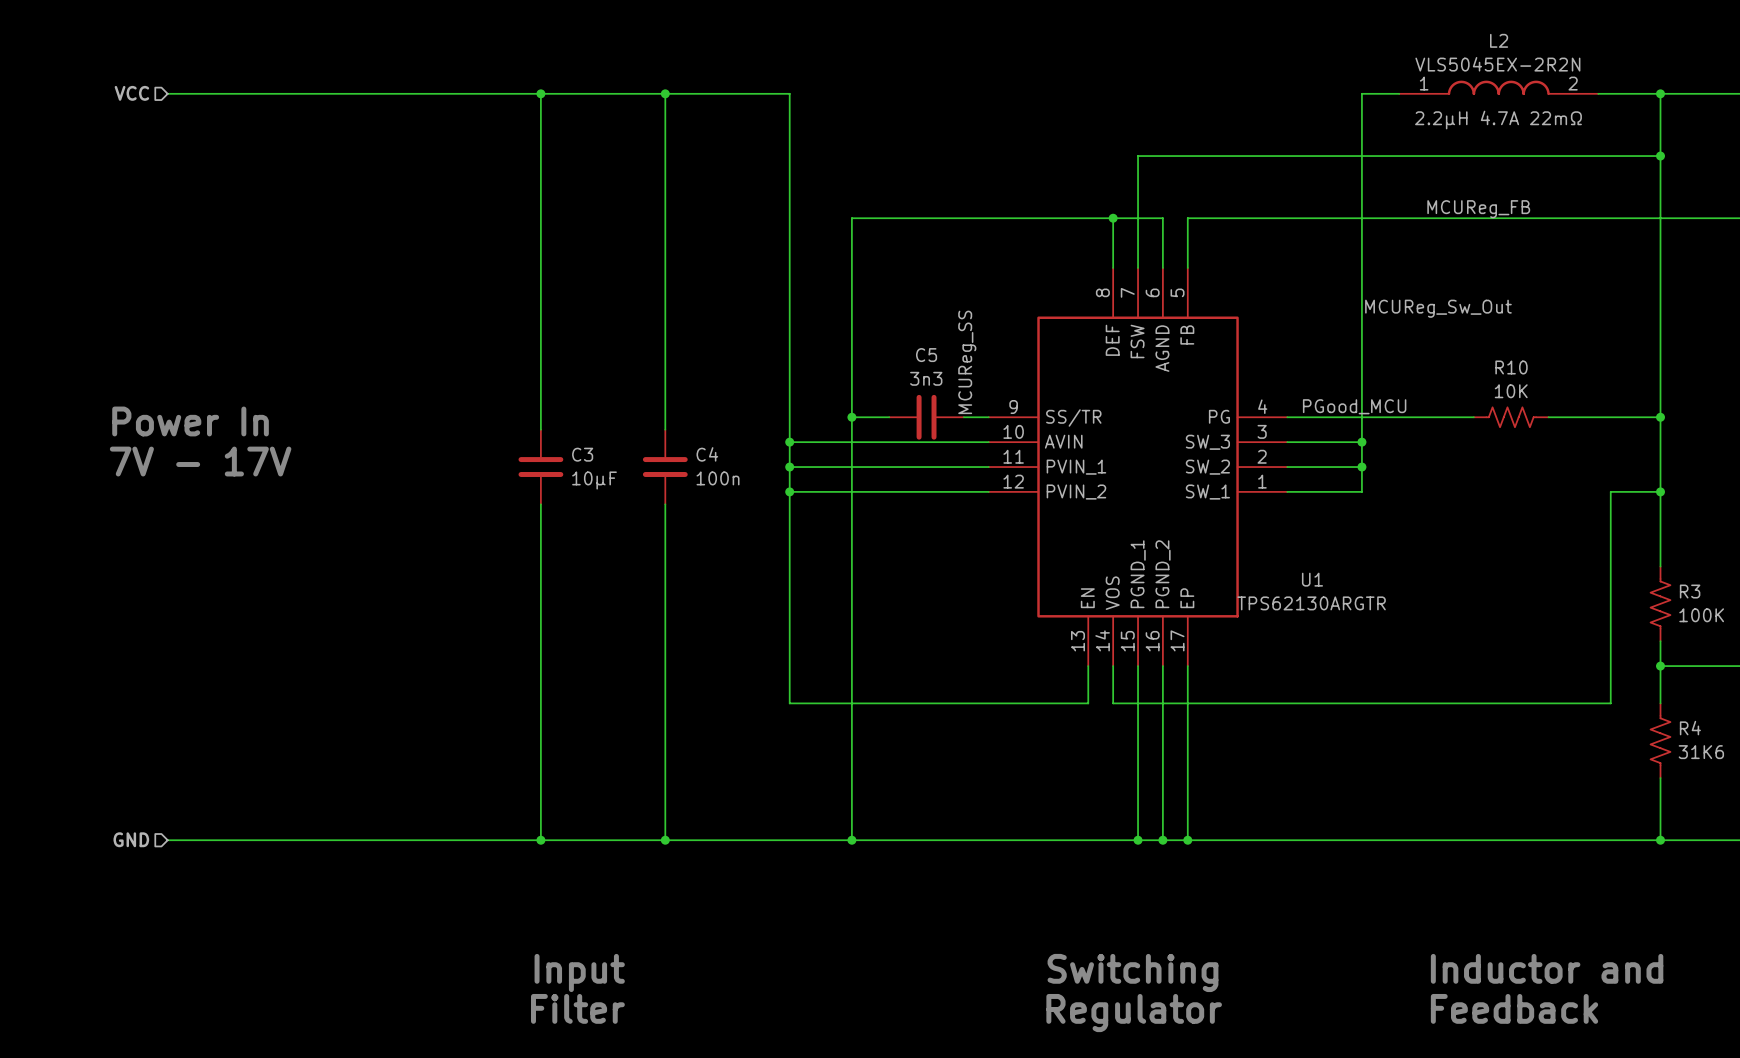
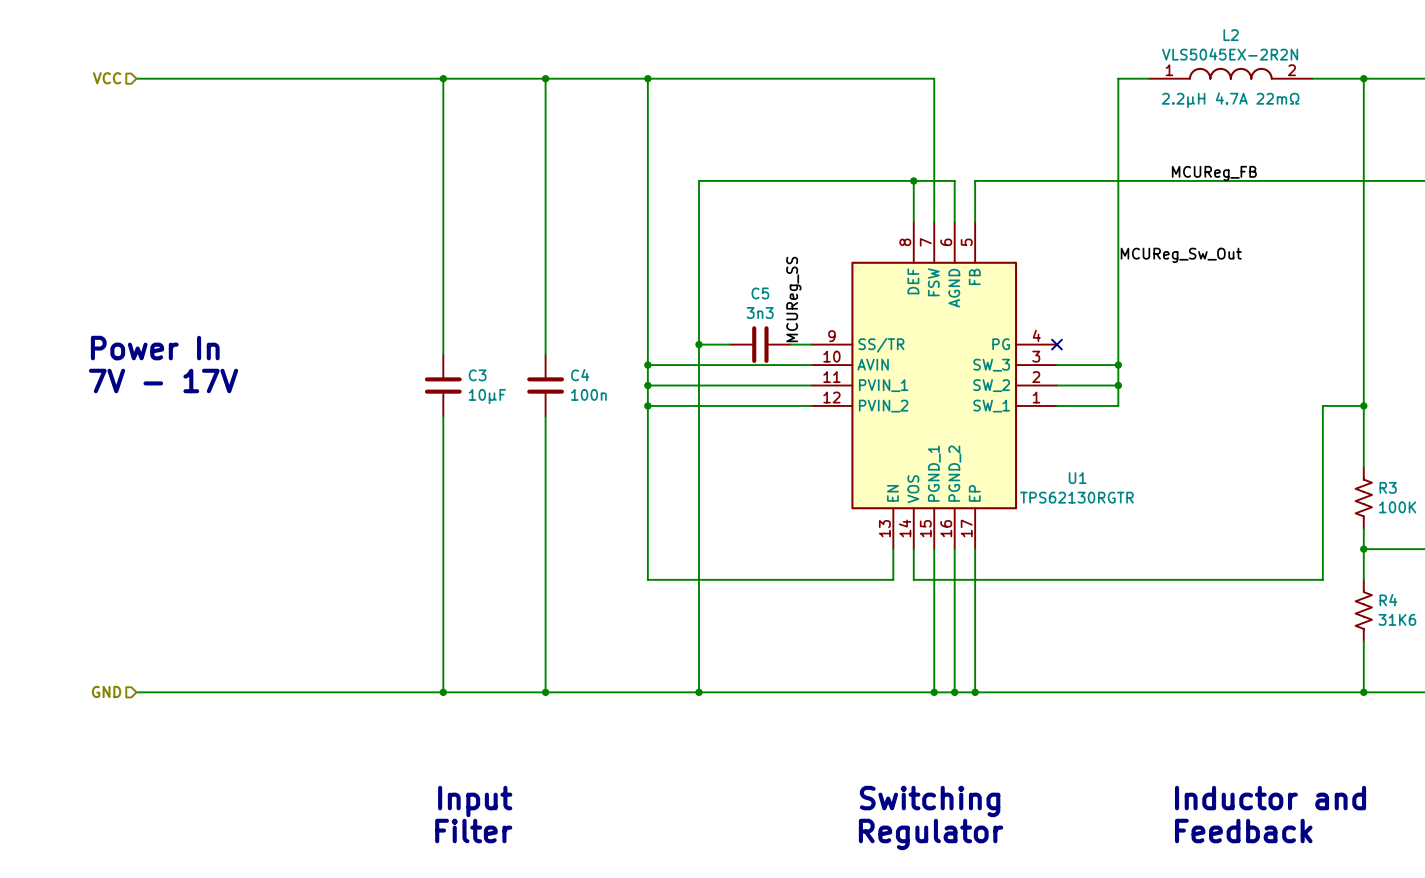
junction: none -> (647, 78)
wire: (1138, 156) (1660, 156) -> (934, 129) (934, 78) (647, 78)
junction: (1660, 156) -> none
label: PGood_MCU (1354, 406) -> none
wire: (1287, 417) (1473, 417) -> none
no-connect mark: none -> (1056, 344)
R10: 10K (1511, 417) -> none
wire: (1548, 417) (1660, 417) -> none
junction: (1660, 417) -> none
U1 value: TPS62130ARGTR (1311, 603) -> TPS62130RGTR (1076, 497)

